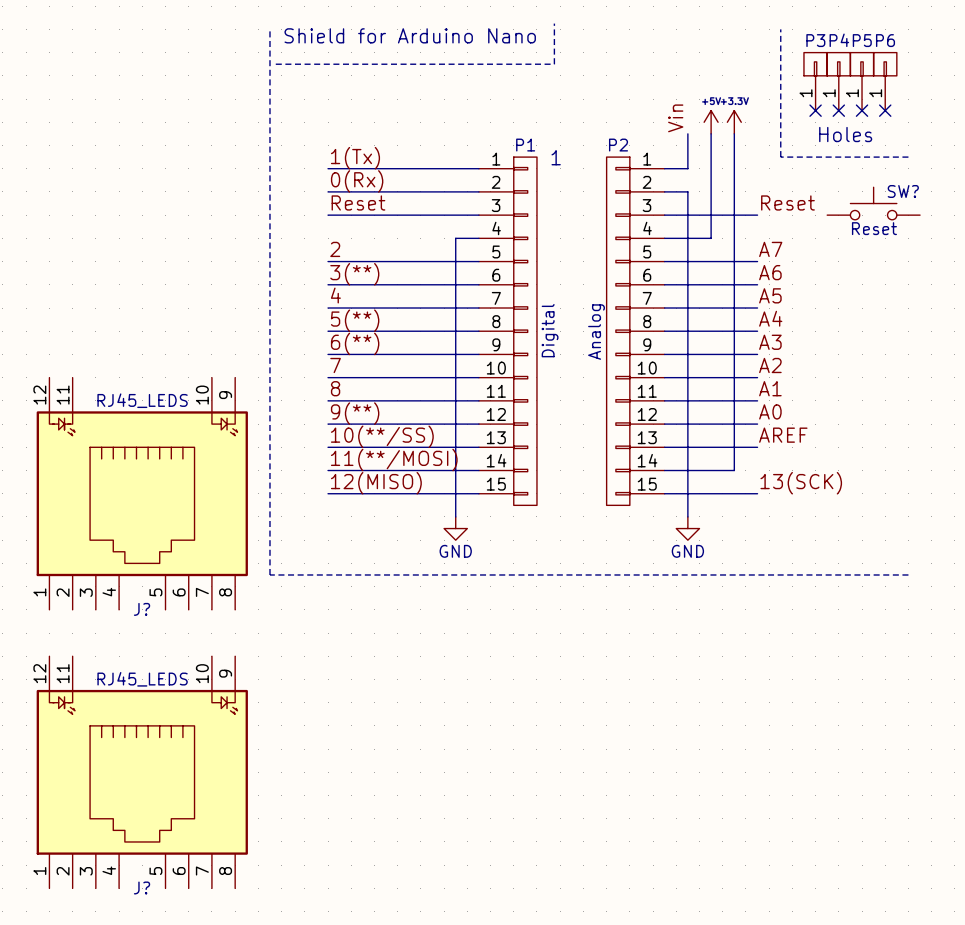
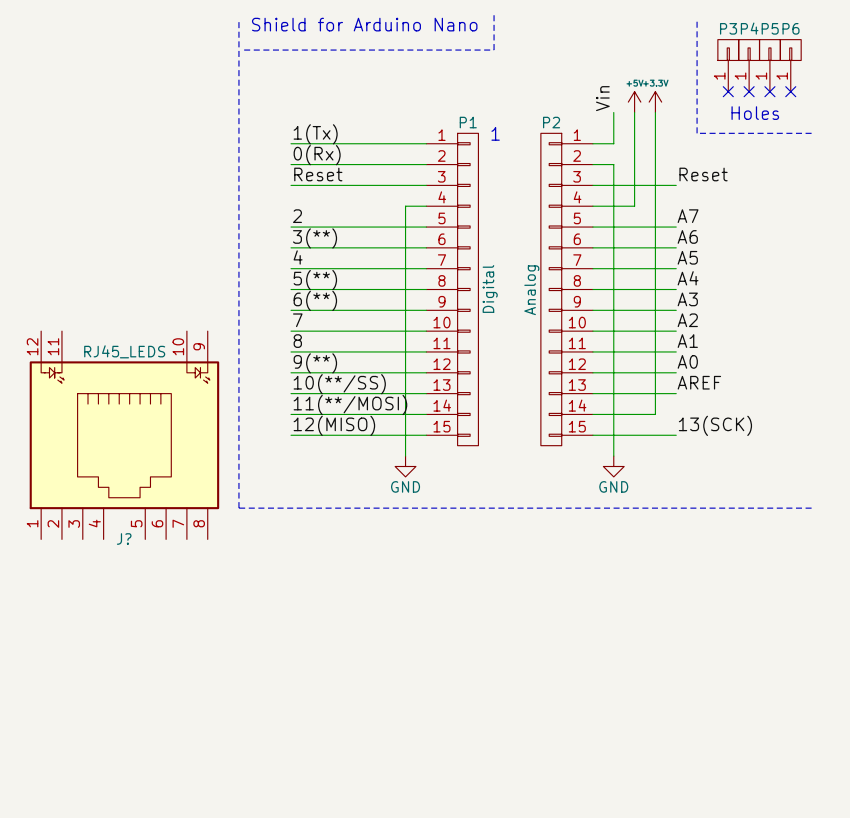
SW?: Reset (873, 203) -> none
J?: RJ45_LEDS (142, 772) -> none

